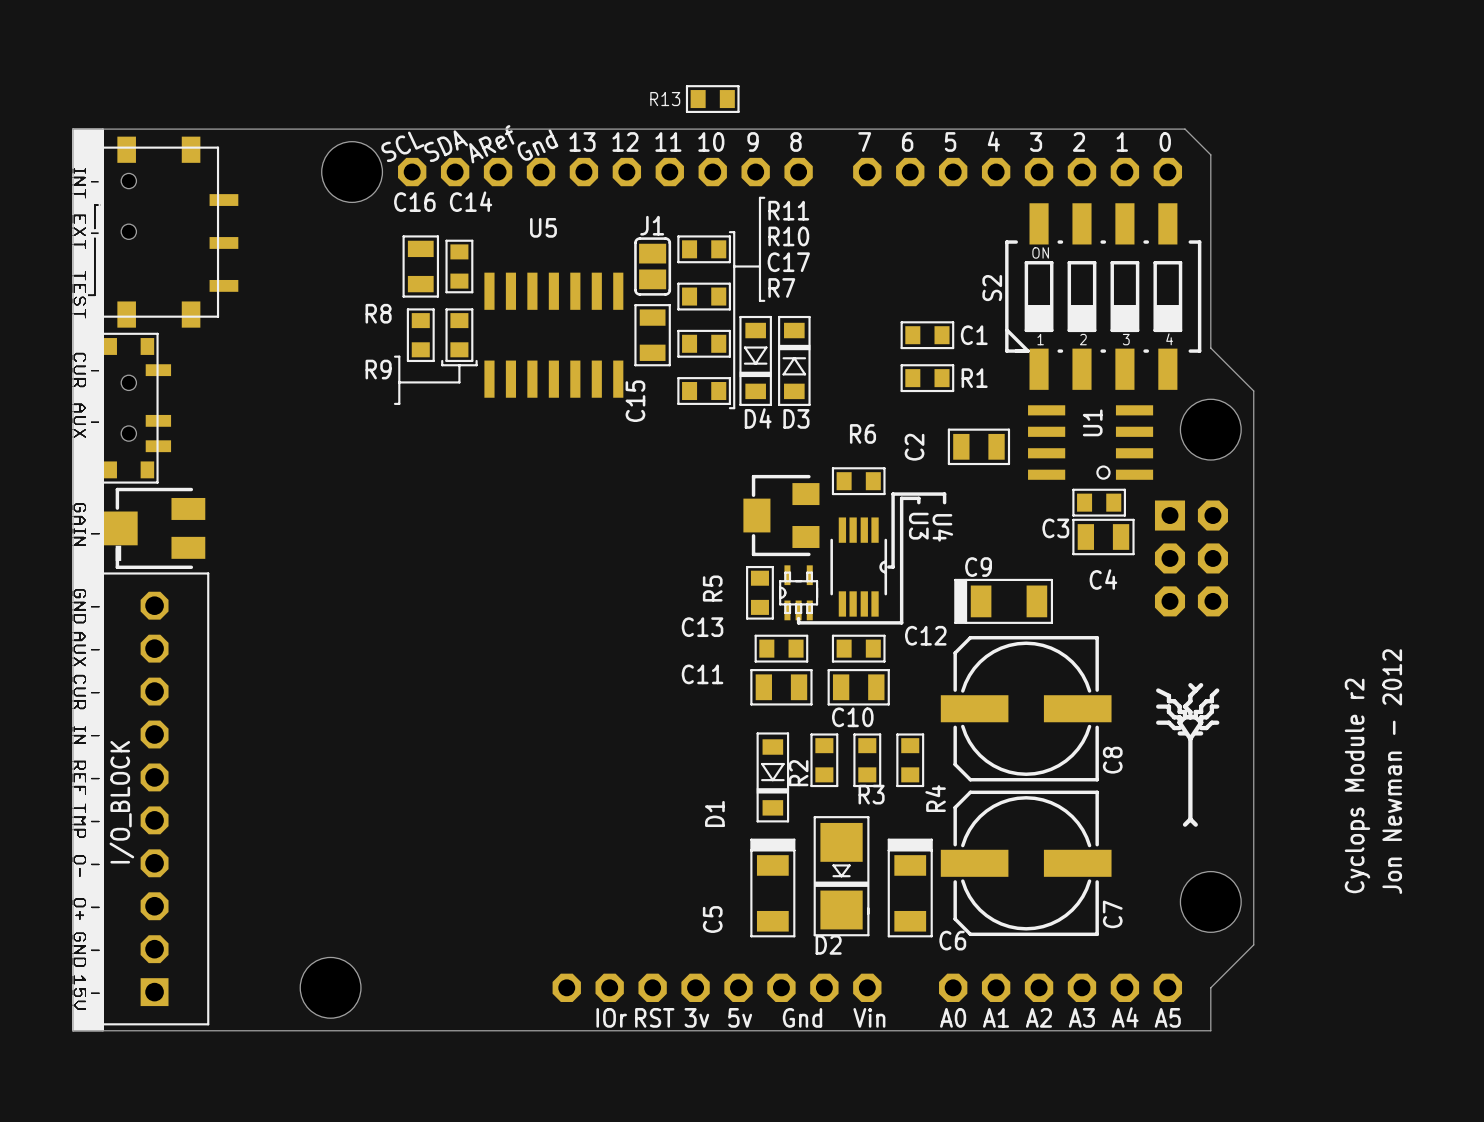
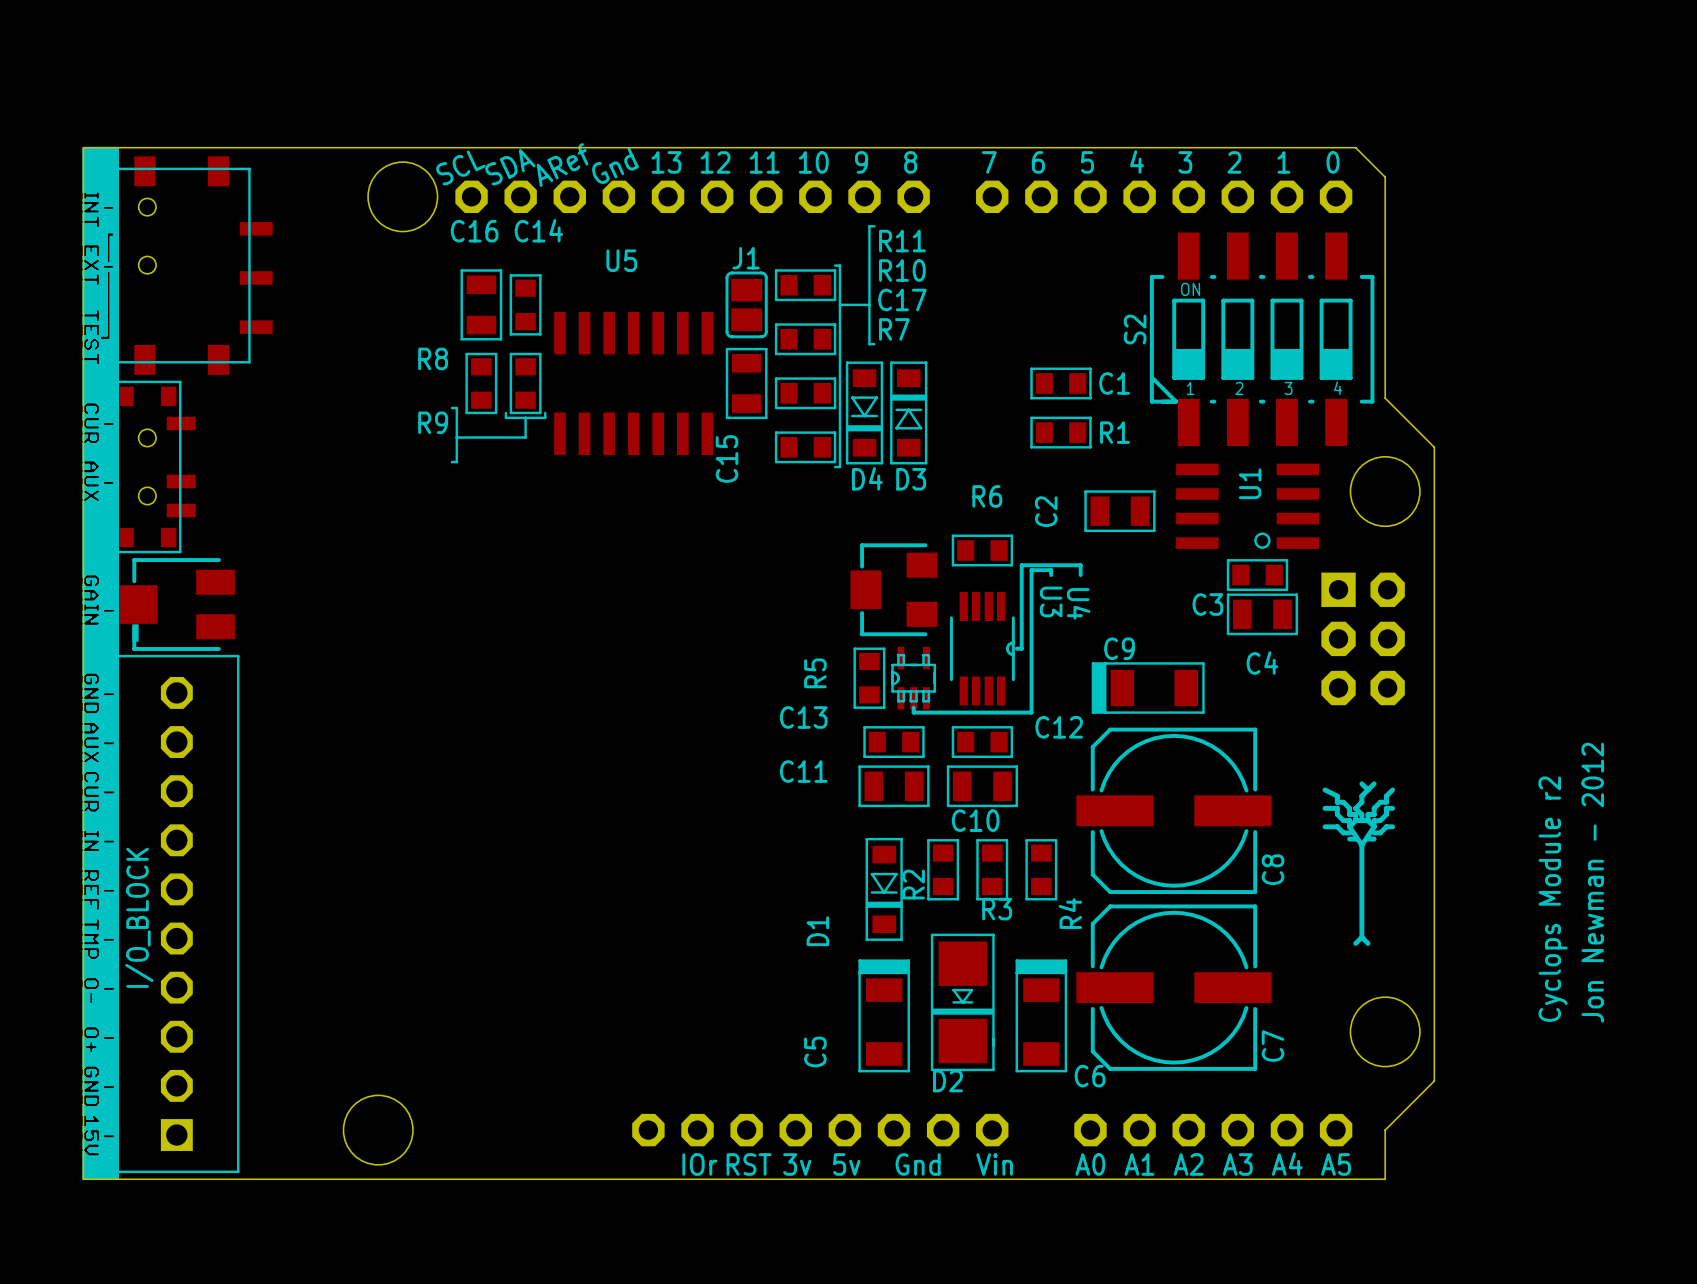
R13: (712, 99) -> none

